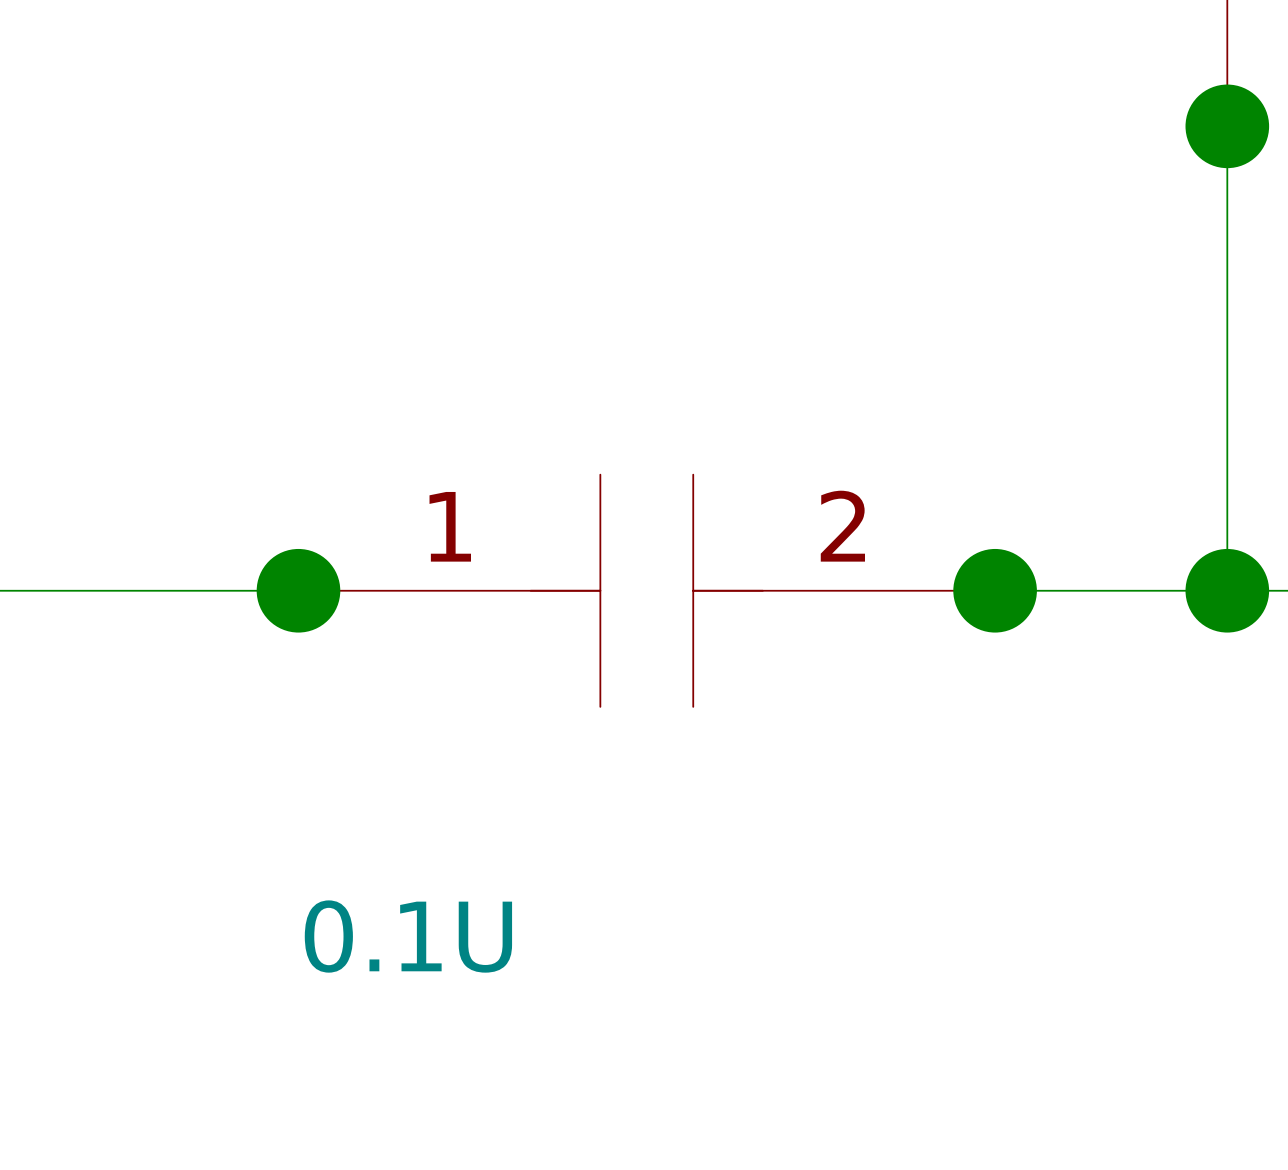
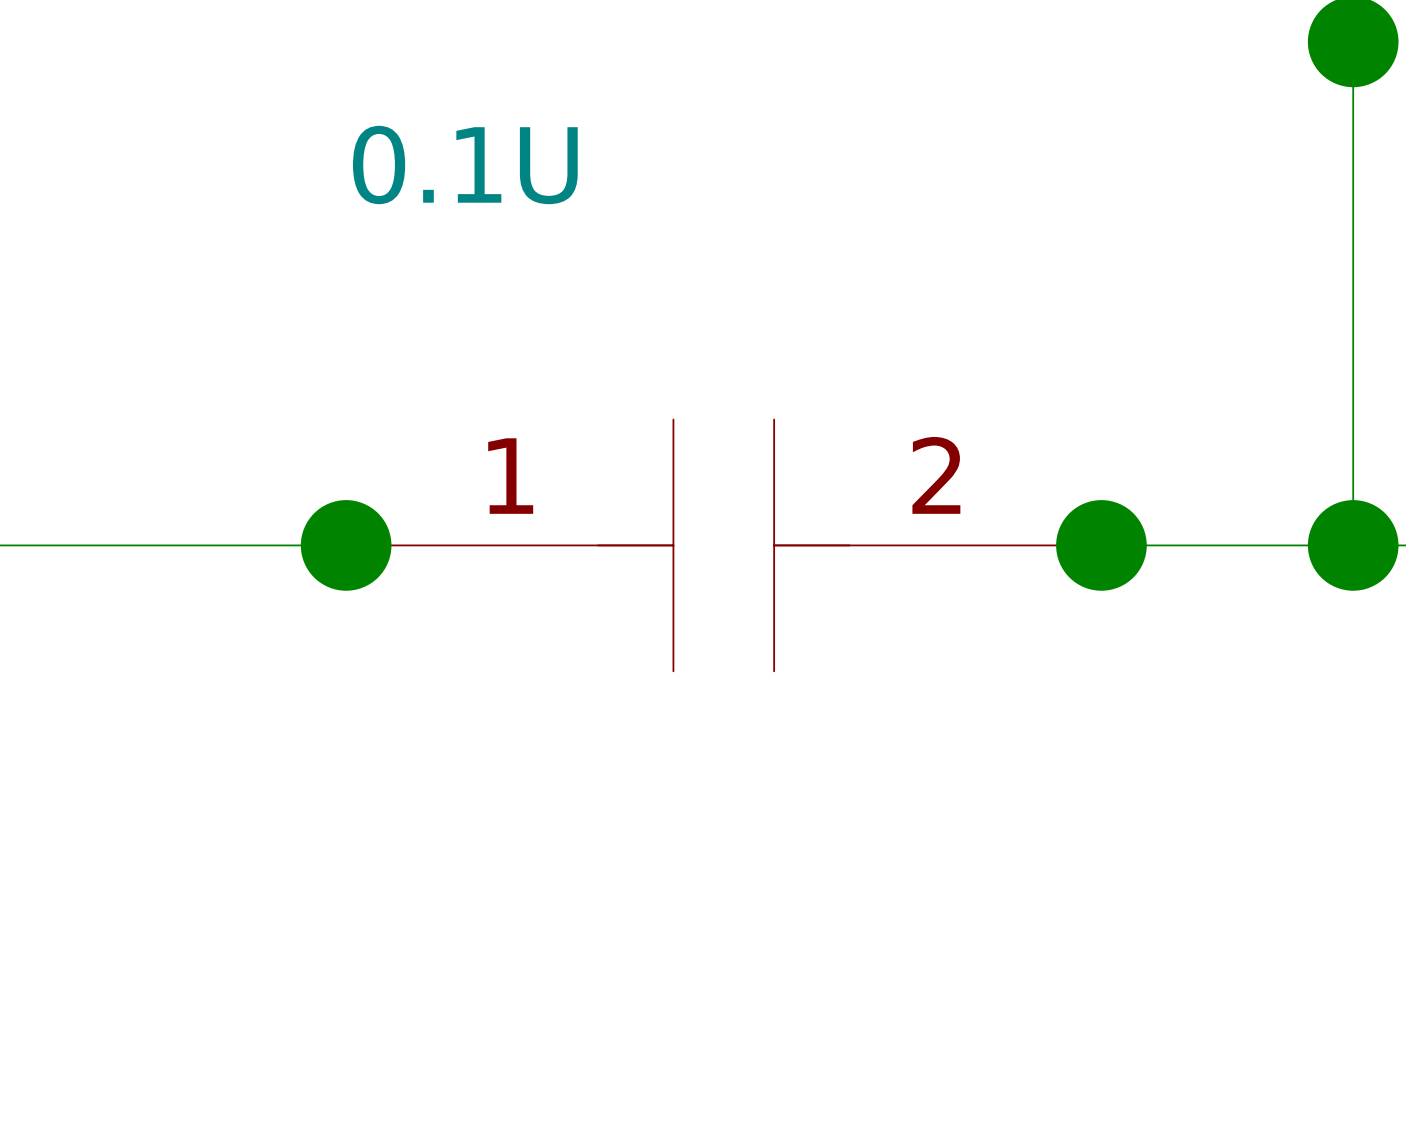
part value position: 0.1U (408, 936) -> 0.1U (465, 165)

